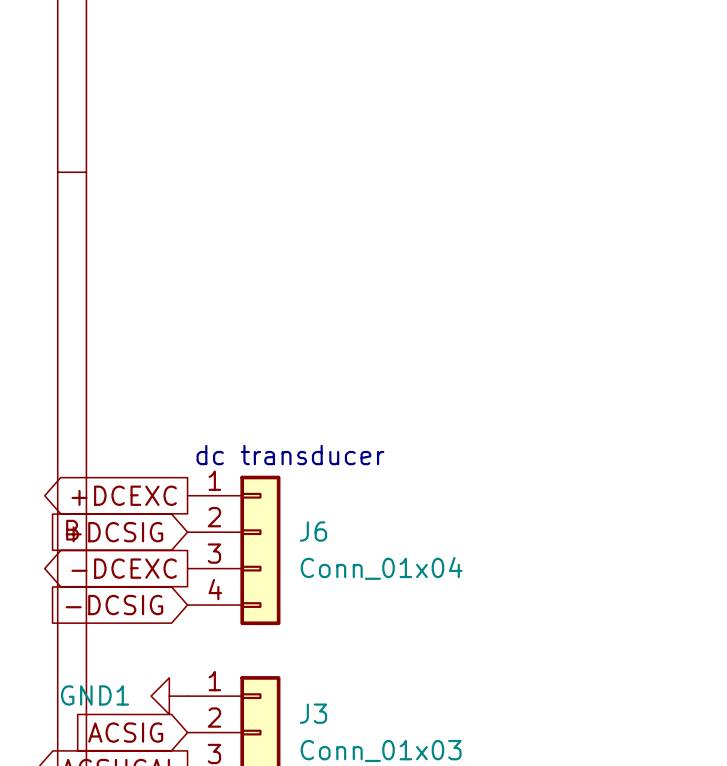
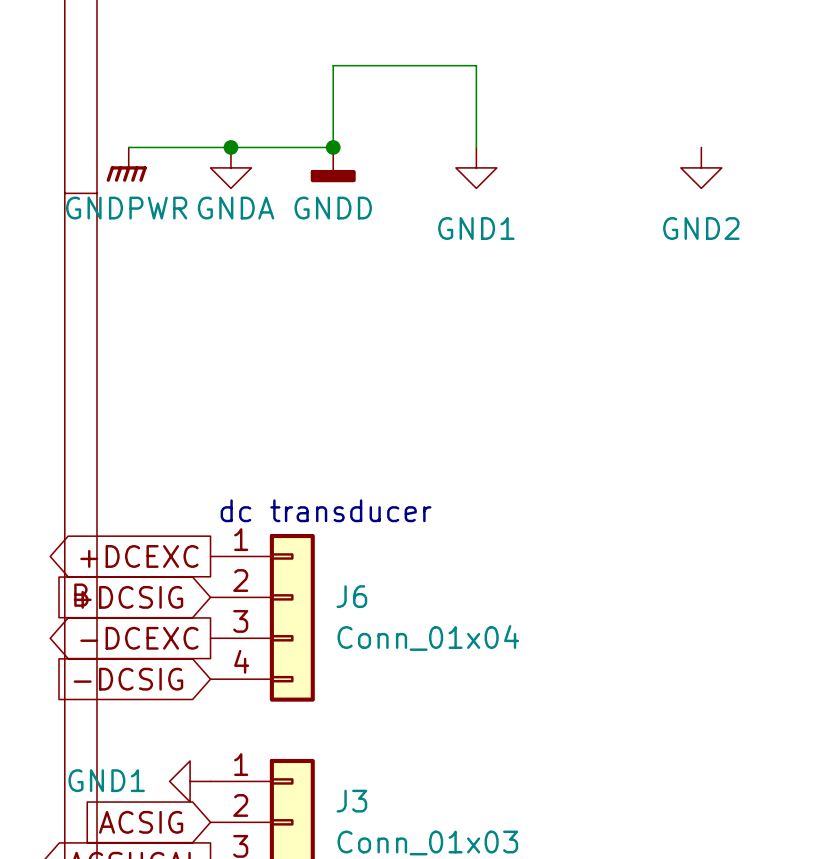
wire: none -> (128, 147) (333, 147) (333, 65) (476, 65) (476, 147)
junction: none -> (230, 147)
junction: none -> (333, 147)
power symbol: none -> GNDPWR (126, 164)
power symbol: none -> GNDD (333, 164)
power symbol: none -> GNDA (230, 167)
power symbol: none -> GND1 (476, 167)
power symbol: none -> GND2 (701, 167)

